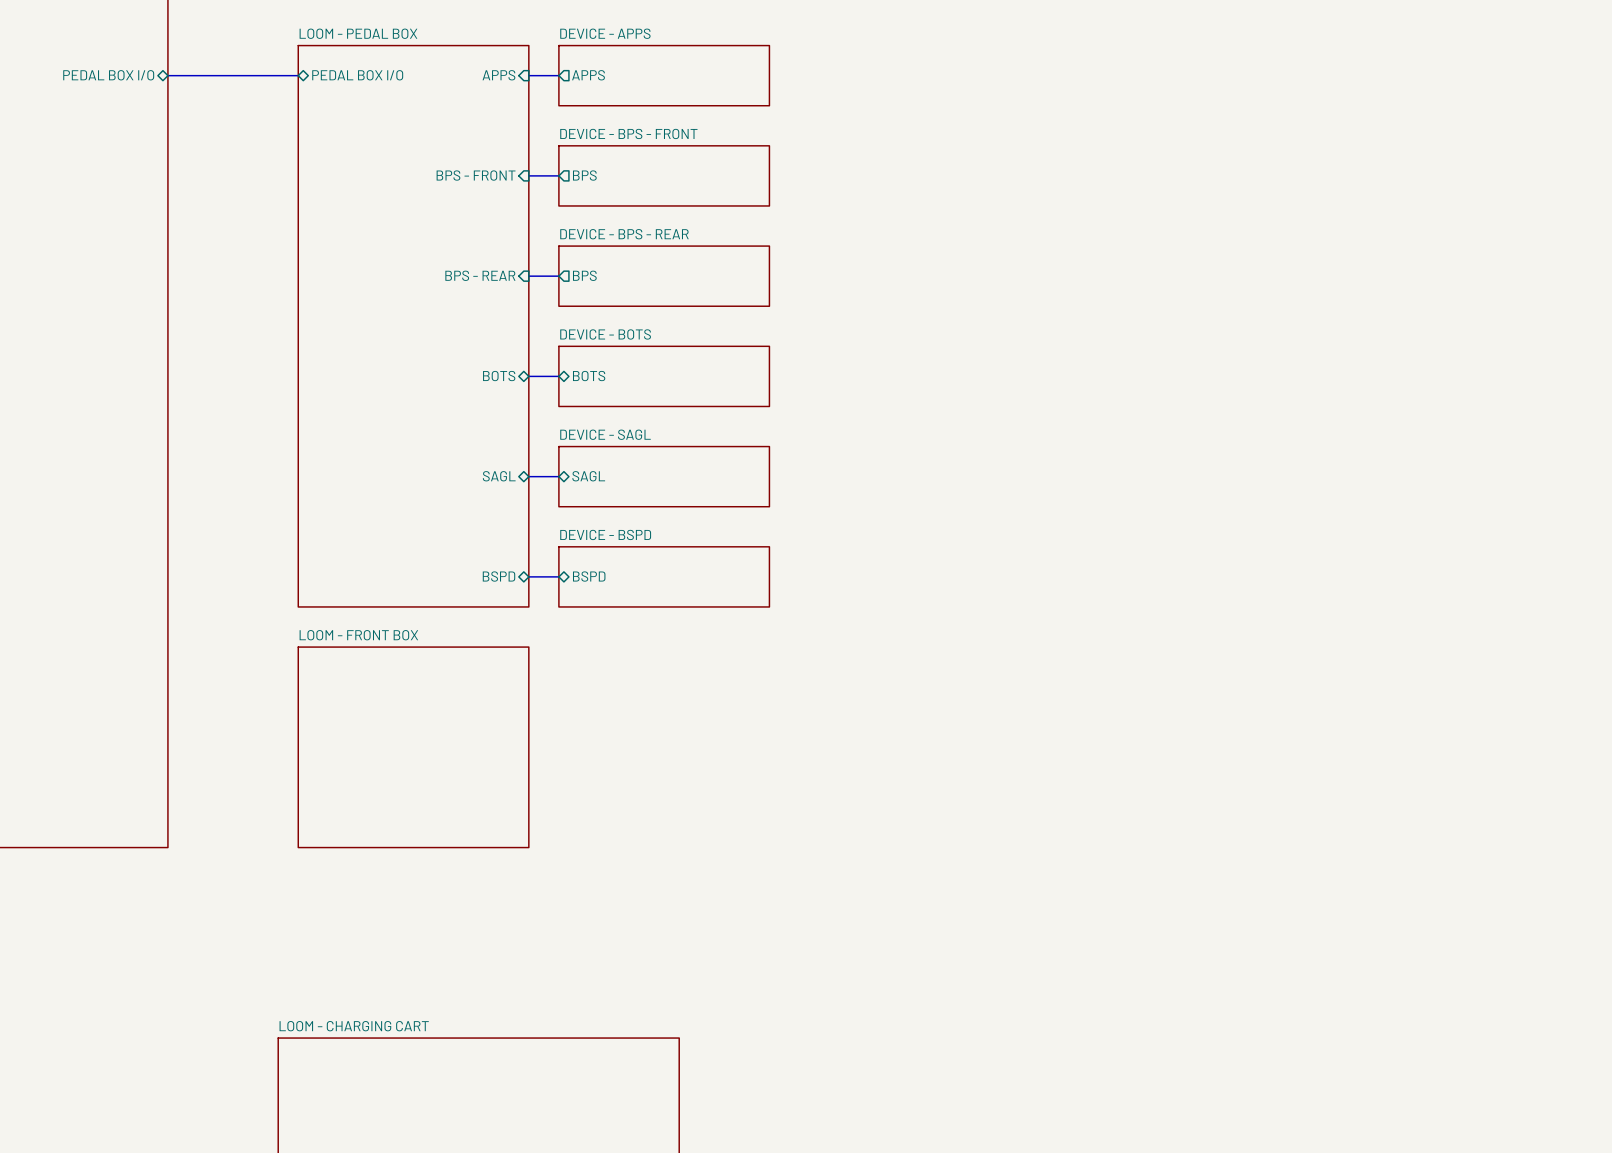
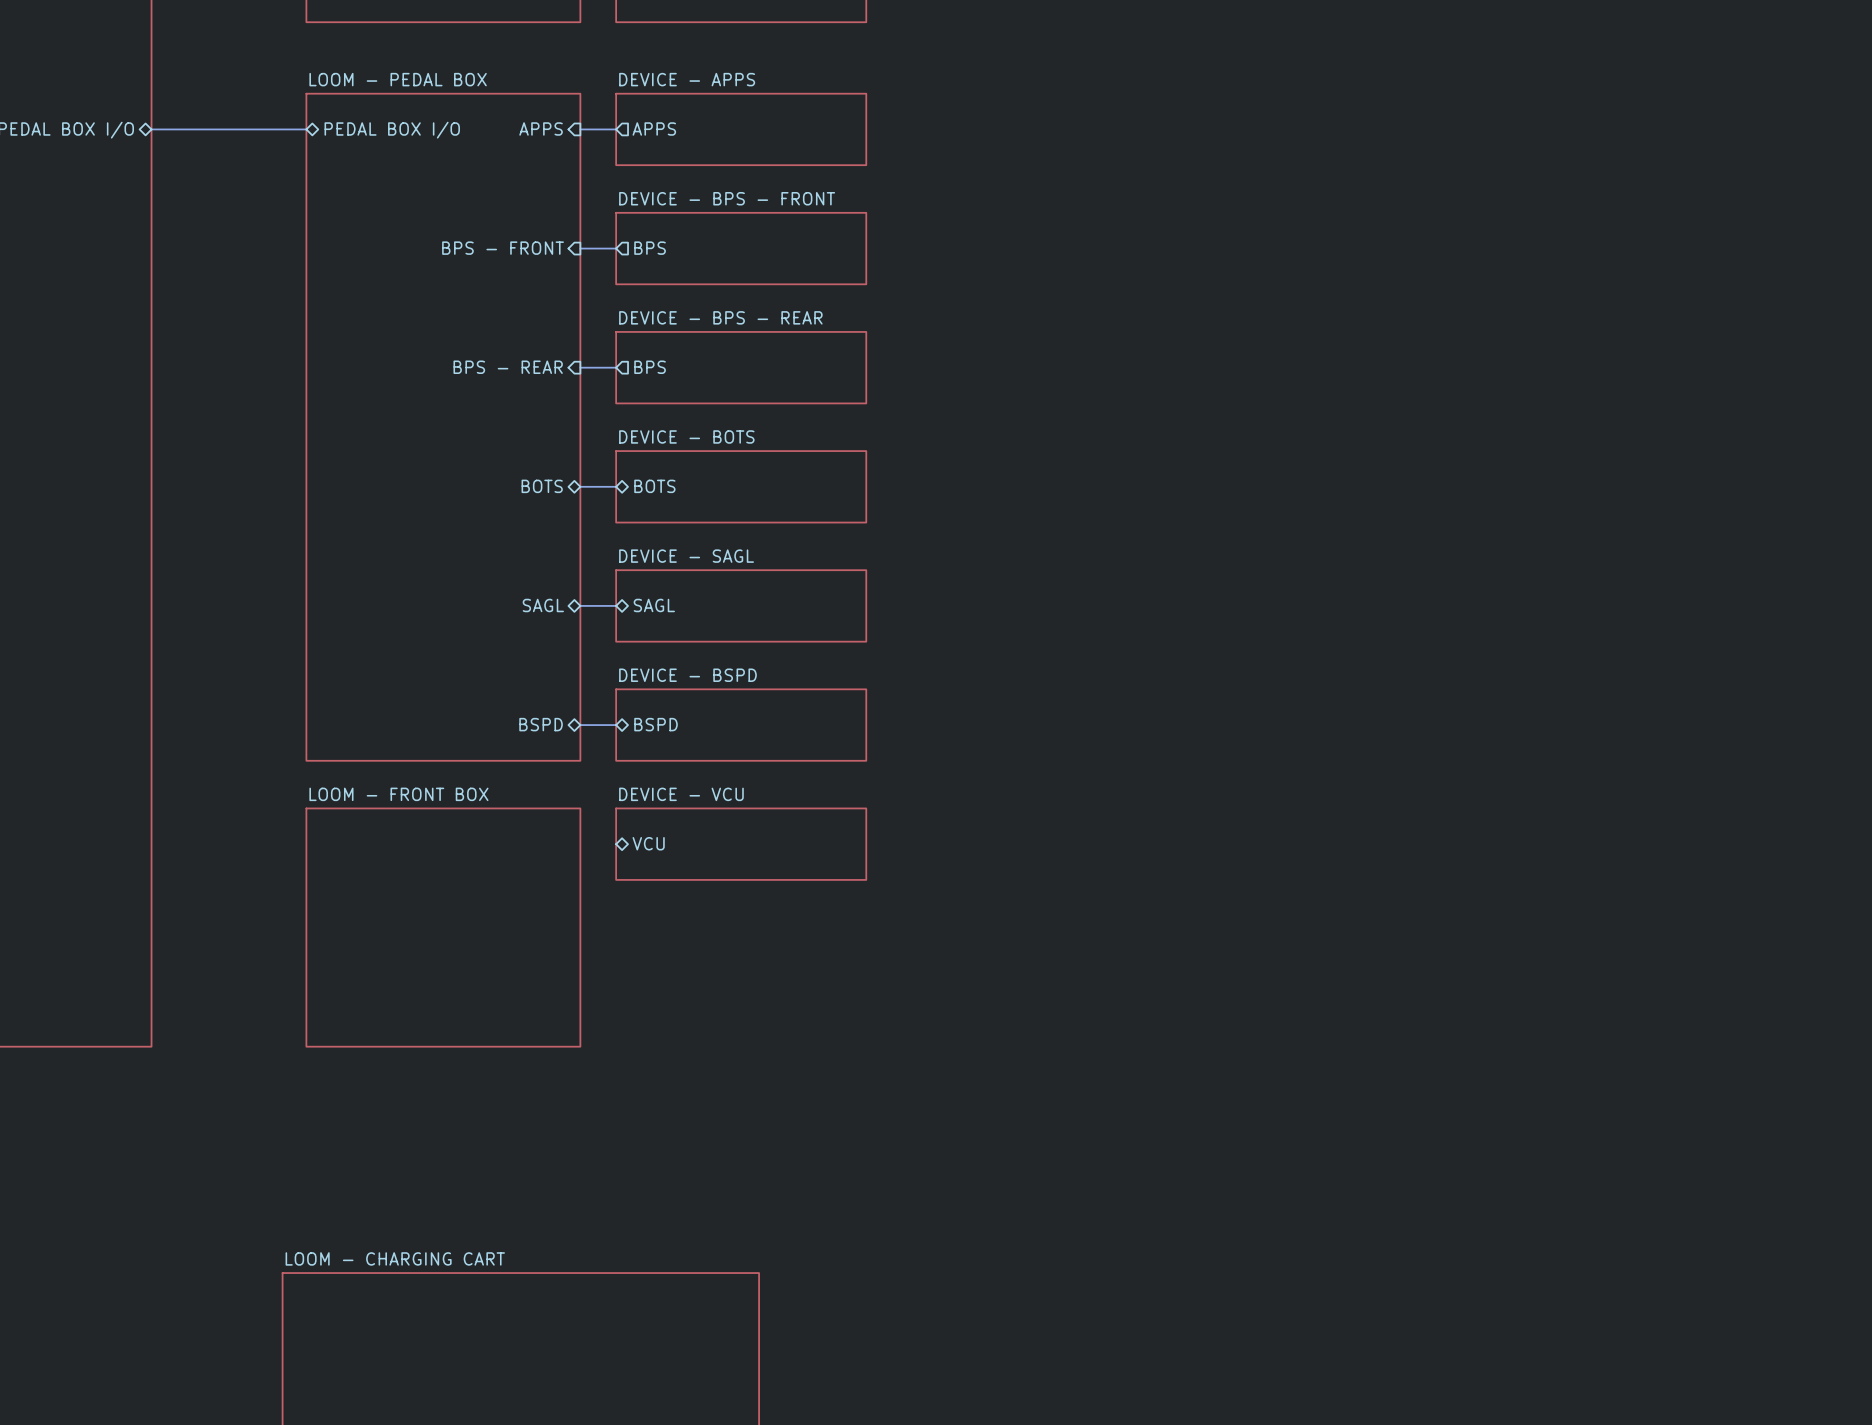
sheet pin: none -> VCU (648, 843)
sheet DEVICE - VCU: none -> (741, 844)

